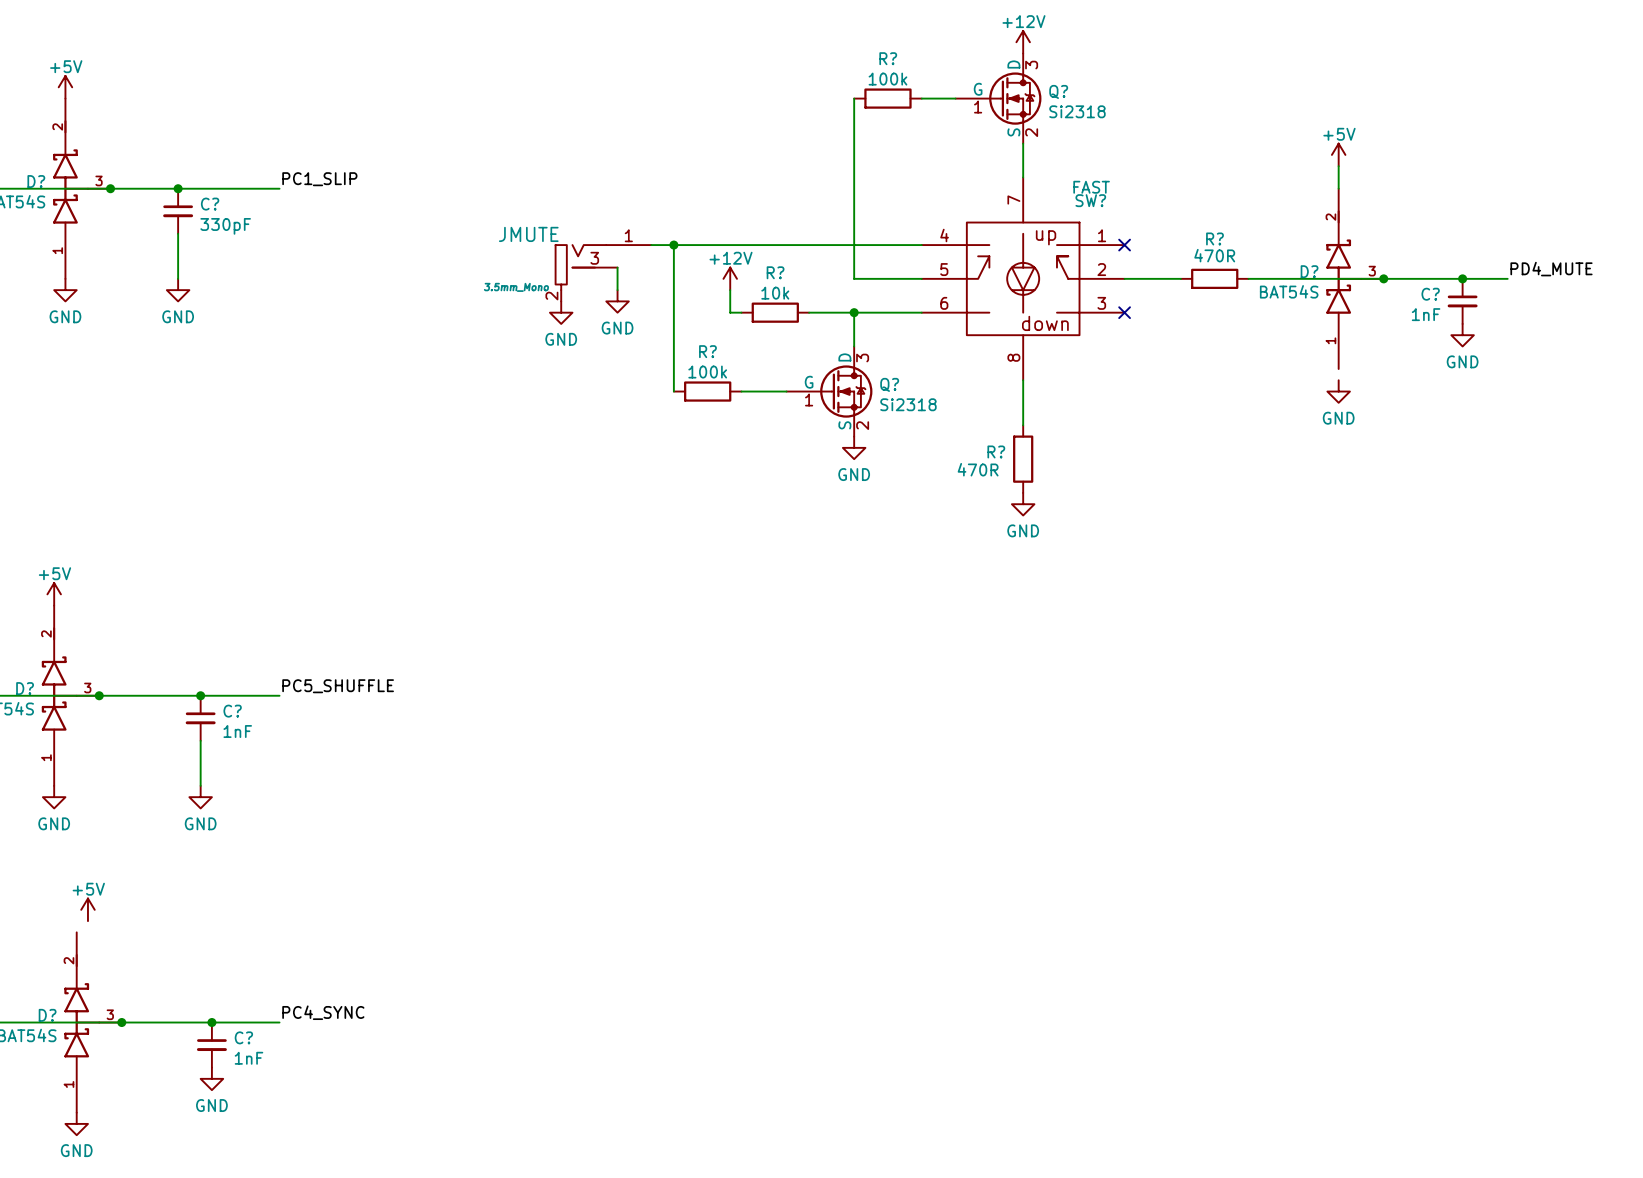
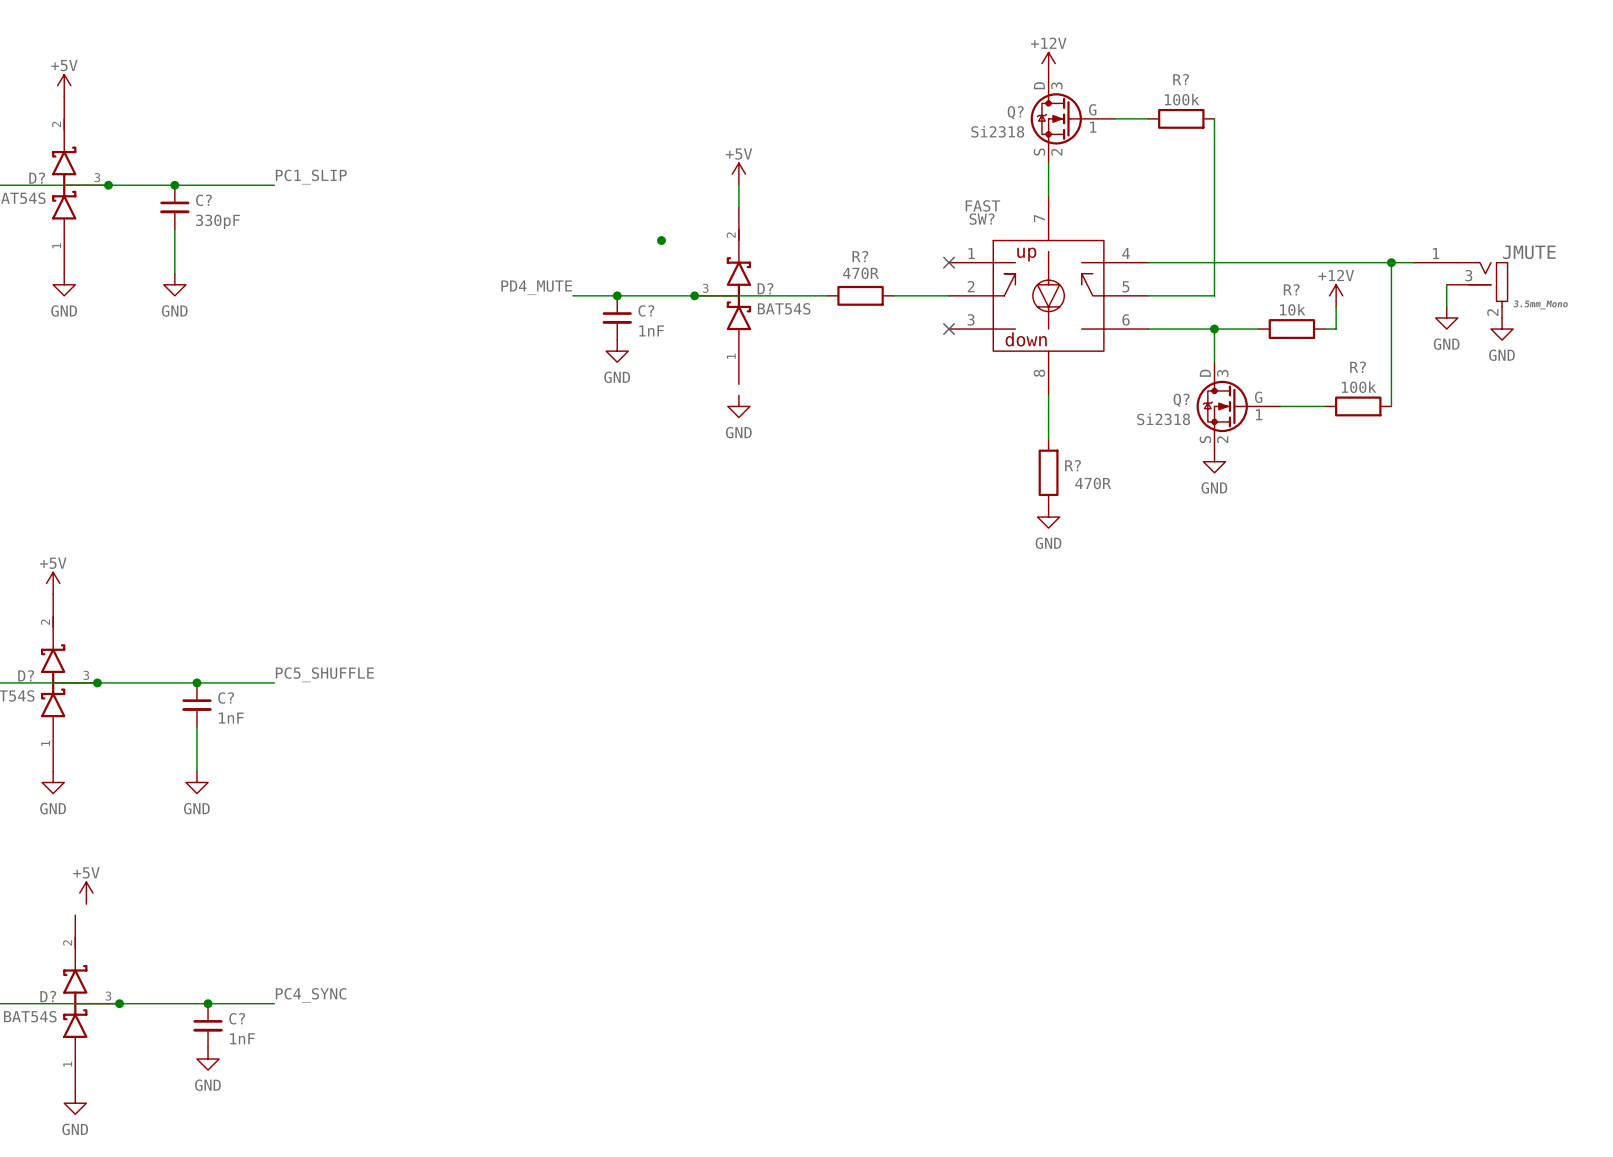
power symbol position: +12V (1023, 42) -> +12V (1048, 63)
wire: (854, 98) (854, 278) (921, 278) -> none
R?: (887, 98) -> none
wire: (921, 98) (955, 98) -> (1114, 118) (1148, 118)
Q?: Si2318 (998, 98) -> none
Q?: none -> Si2318 (1072, 118)
R?: none -> (1181, 118)
wire: none -> (1214, 118) (1214, 295) (1148, 295)
wire: (1023, 143) (1023, 177) -> (1048, 163) (1048, 196)
power symbol: +5V (1338, 154) -> none
wire: (1338, 166) (1338, 188) -> (1446, 284) (1446, 306)
power symbol: none -> +5V (738, 174)
wire: (651, 245) (921, 245) -> none
wire: (673, 245) (673, 391) -> none
no-connect mark: (1124, 245) -> none
wire: (617, 267) (617, 290) -> (738, 185) (738, 207)
no-connect mark: none -> (949, 262)
wire: none -> (1148, 262) (1413, 262)
wire: none -> (1391, 262) (1391, 406)
junction: none -> (1391, 262)
label: PD4_MUTE (1551, 269) -> none
JMUTE: (603, 273) -> none
power symbol: +12V (730, 278) -> none
SW?: (1023, 278) -> none
wire: (1124, 278) (1180, 278) -> (893, 295) (949, 295)
R?: (1214, 278) -> none
wire: (1248, 278) (1507, 278) -> none
D?: BAT54S (1355, 278) -> none
junction: (1383, 278) -> none
junction: (1462, 278) -> none
wire: (730, 290) (730, 312) (741, 312) -> none
label: none -> PD4_MUTE (536, 287)
JMUTE: none -> (1460, 290)
wire: none -> (573, 295) (827, 295)
power symbol: GND (617, 301) -> none
junction: none -> (617, 295)
junction: none -> (694, 295)
D?: none -> BAT54S (722, 295)
R?: none -> (860, 295)
SW?: none -> (1048, 295)
power symbol: none -> +12V (1336, 295)
C?: (1462, 301) -> none
power symbol: GND (561, 312) -> none
R?: (775, 312) -> none
wire: (809, 312) (921, 312) -> none
wire: (854, 312) (854, 346) -> none
junction: (854, 312) -> none
no-connect mark: (1124, 312) -> none
wire: none -> (1336, 306) (1336, 329) (1325, 329)
C?: none -> (617, 317)
no-connect mark: none -> (949, 329)
wire: none -> (1148, 329) (1258, 329)
wire: none -> (1214, 329) (1214, 362)
junction: none -> (1214, 329)
R?: none -> (1291, 329)
power symbol position: GND (1462, 335) -> GND (1446, 317)
power symbol: none -> GND (1502, 329)
power symbol: none -> GND (617, 351)
wire: (1023, 380) (1023, 425) -> (1048, 395) (1048, 439)
R?: (707, 391) -> none
wire: (741, 391) (786, 391) -> none
Q?: Si2318 (829, 391) -> none
power symbol: GND (1338, 391) -> none
power symbol: none -> GND (738, 406)
Q?: none -> Si2318 (1238, 406)
wire: none -> (1280, 406) (1325, 406)
R?: none -> (1358, 406)
power symbol: GND (854, 447) -> none
R? name position: R? (996, 451) -> R? (1073, 465)
R? position: (1023, 459) -> (1048, 472)
R? text position: 470R (978, 469) -> 470R (1093, 483)
power symbol: none -> GND (1214, 461)
power symbol position: GND (1023, 504) -> GND (1048, 517)

